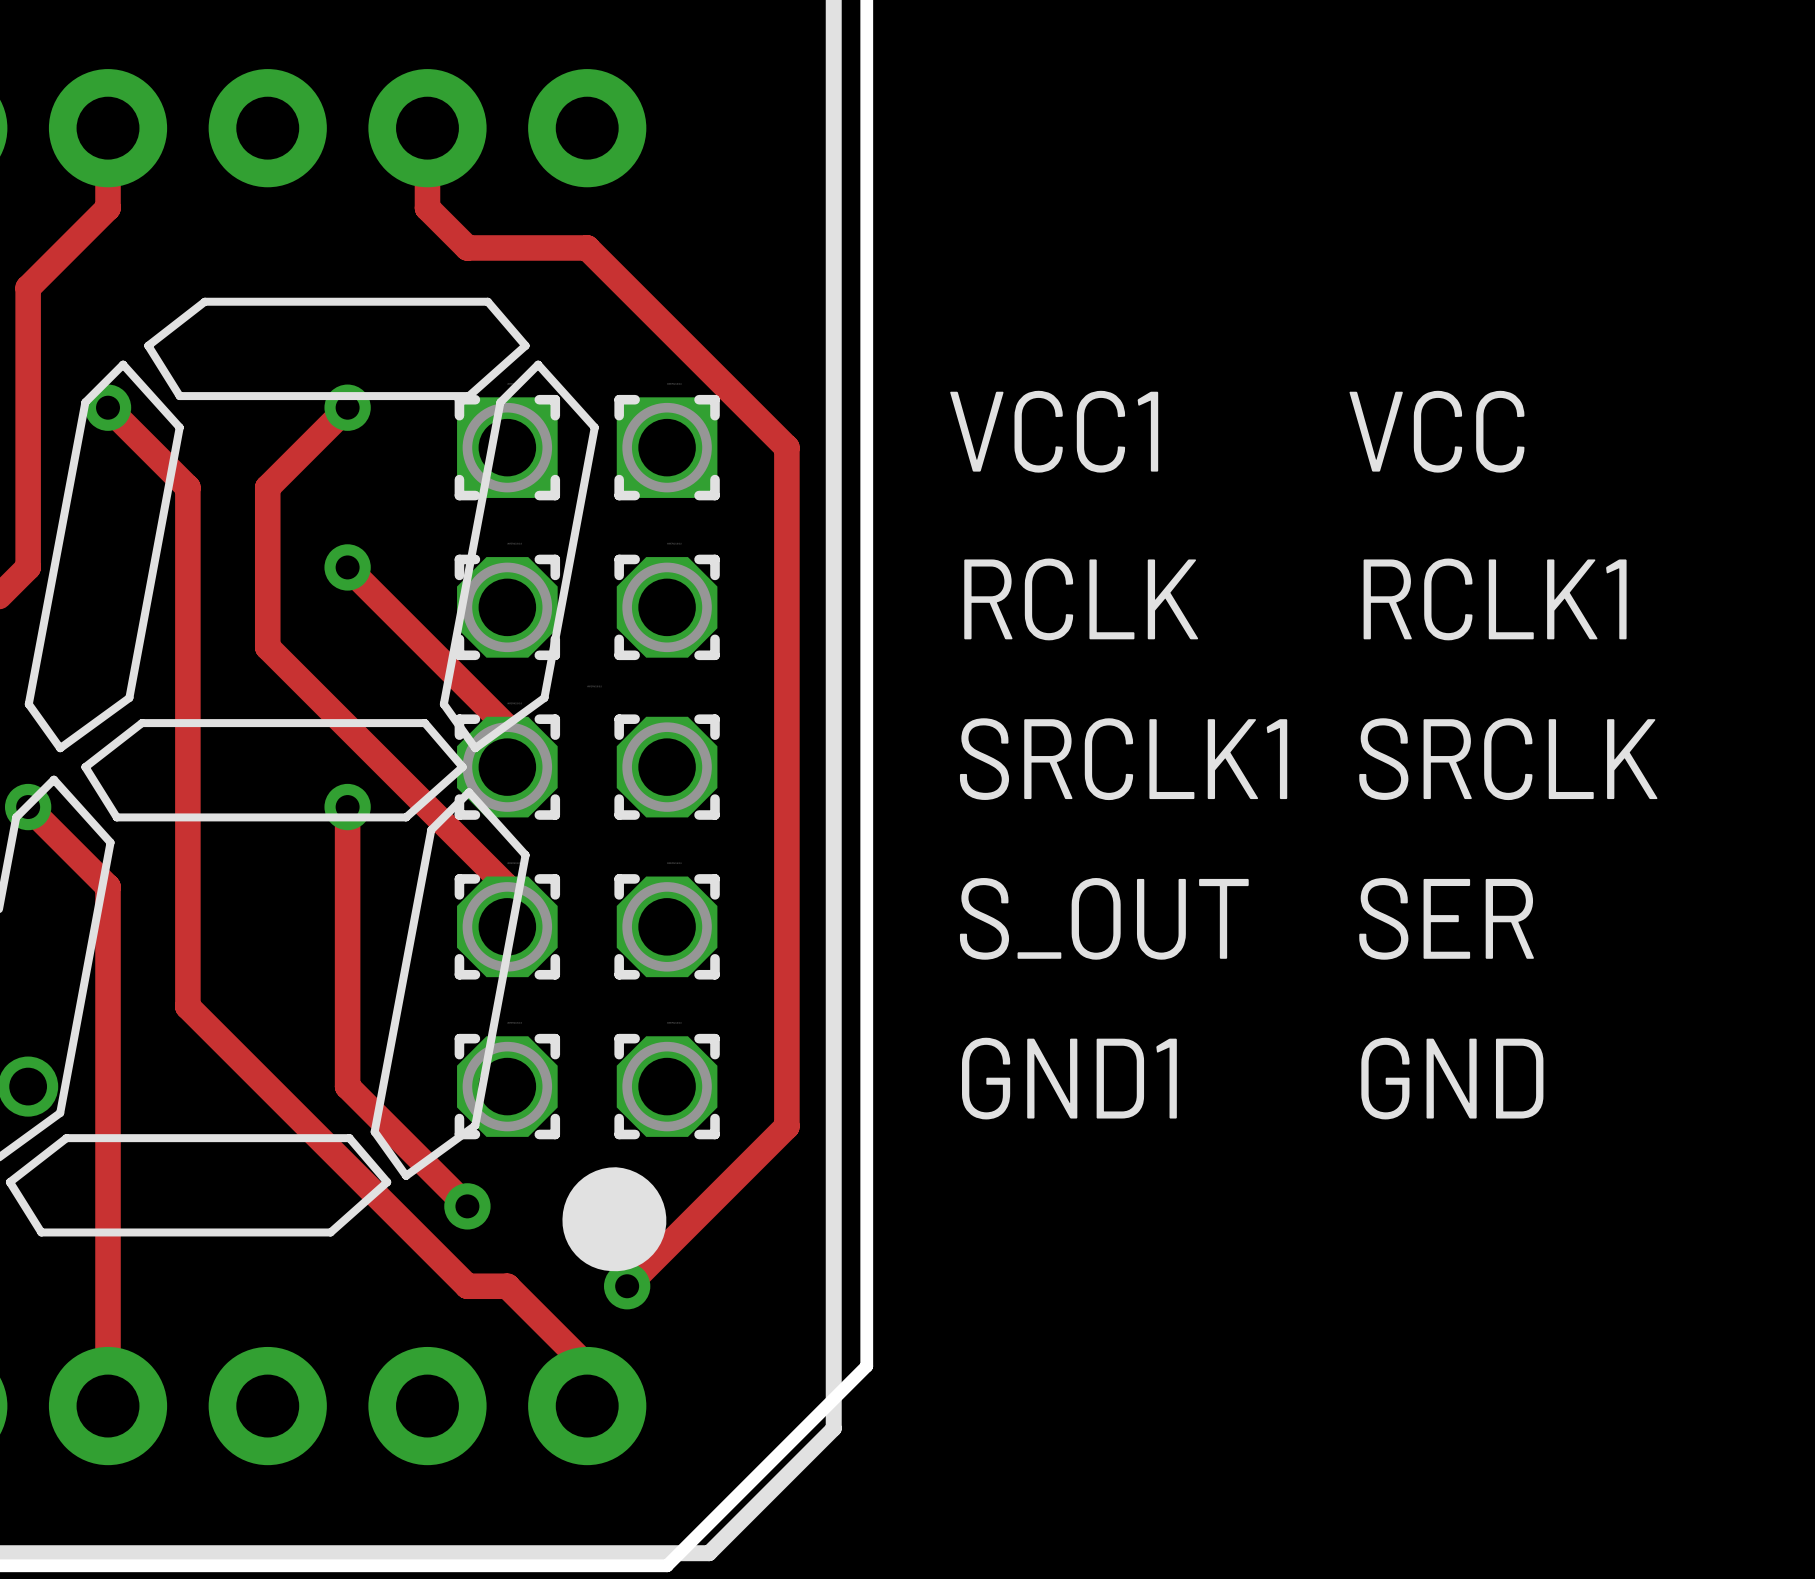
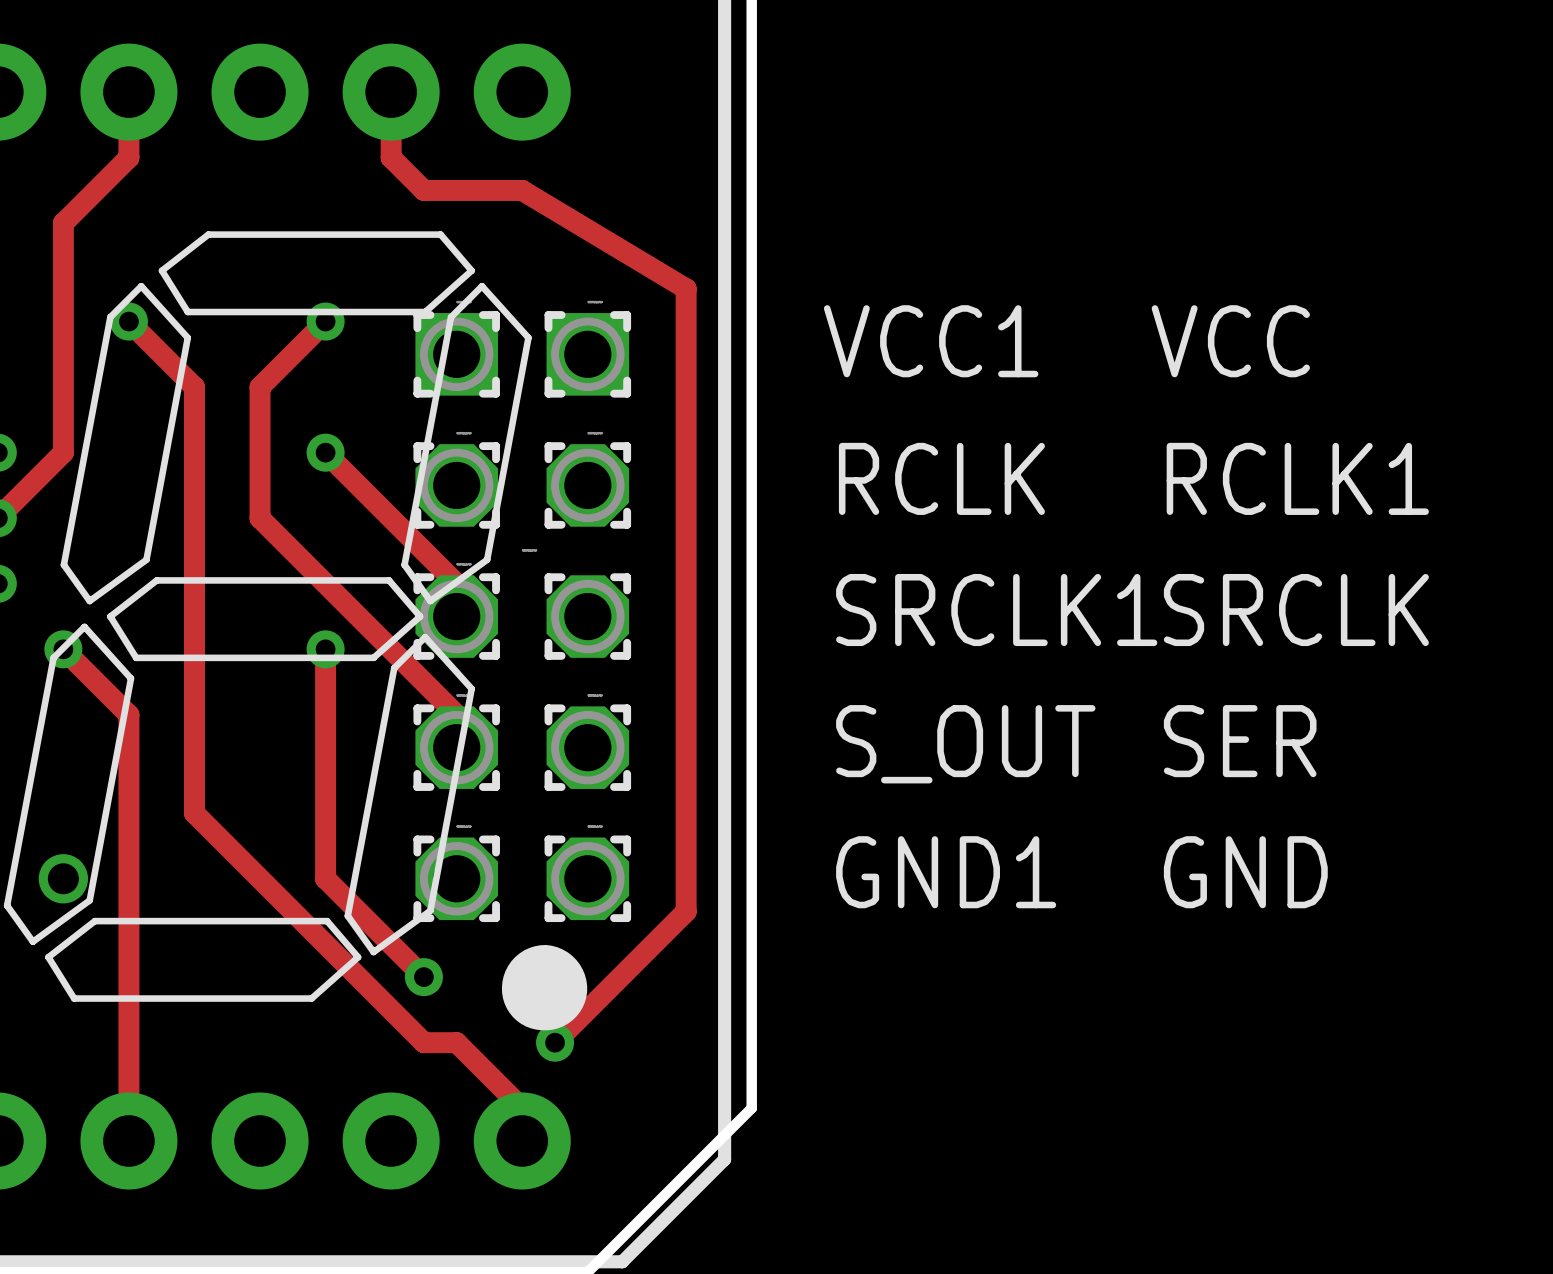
track: (587, 247) (786, 447) -> (522, 190) (686, 288) (686, 354)

